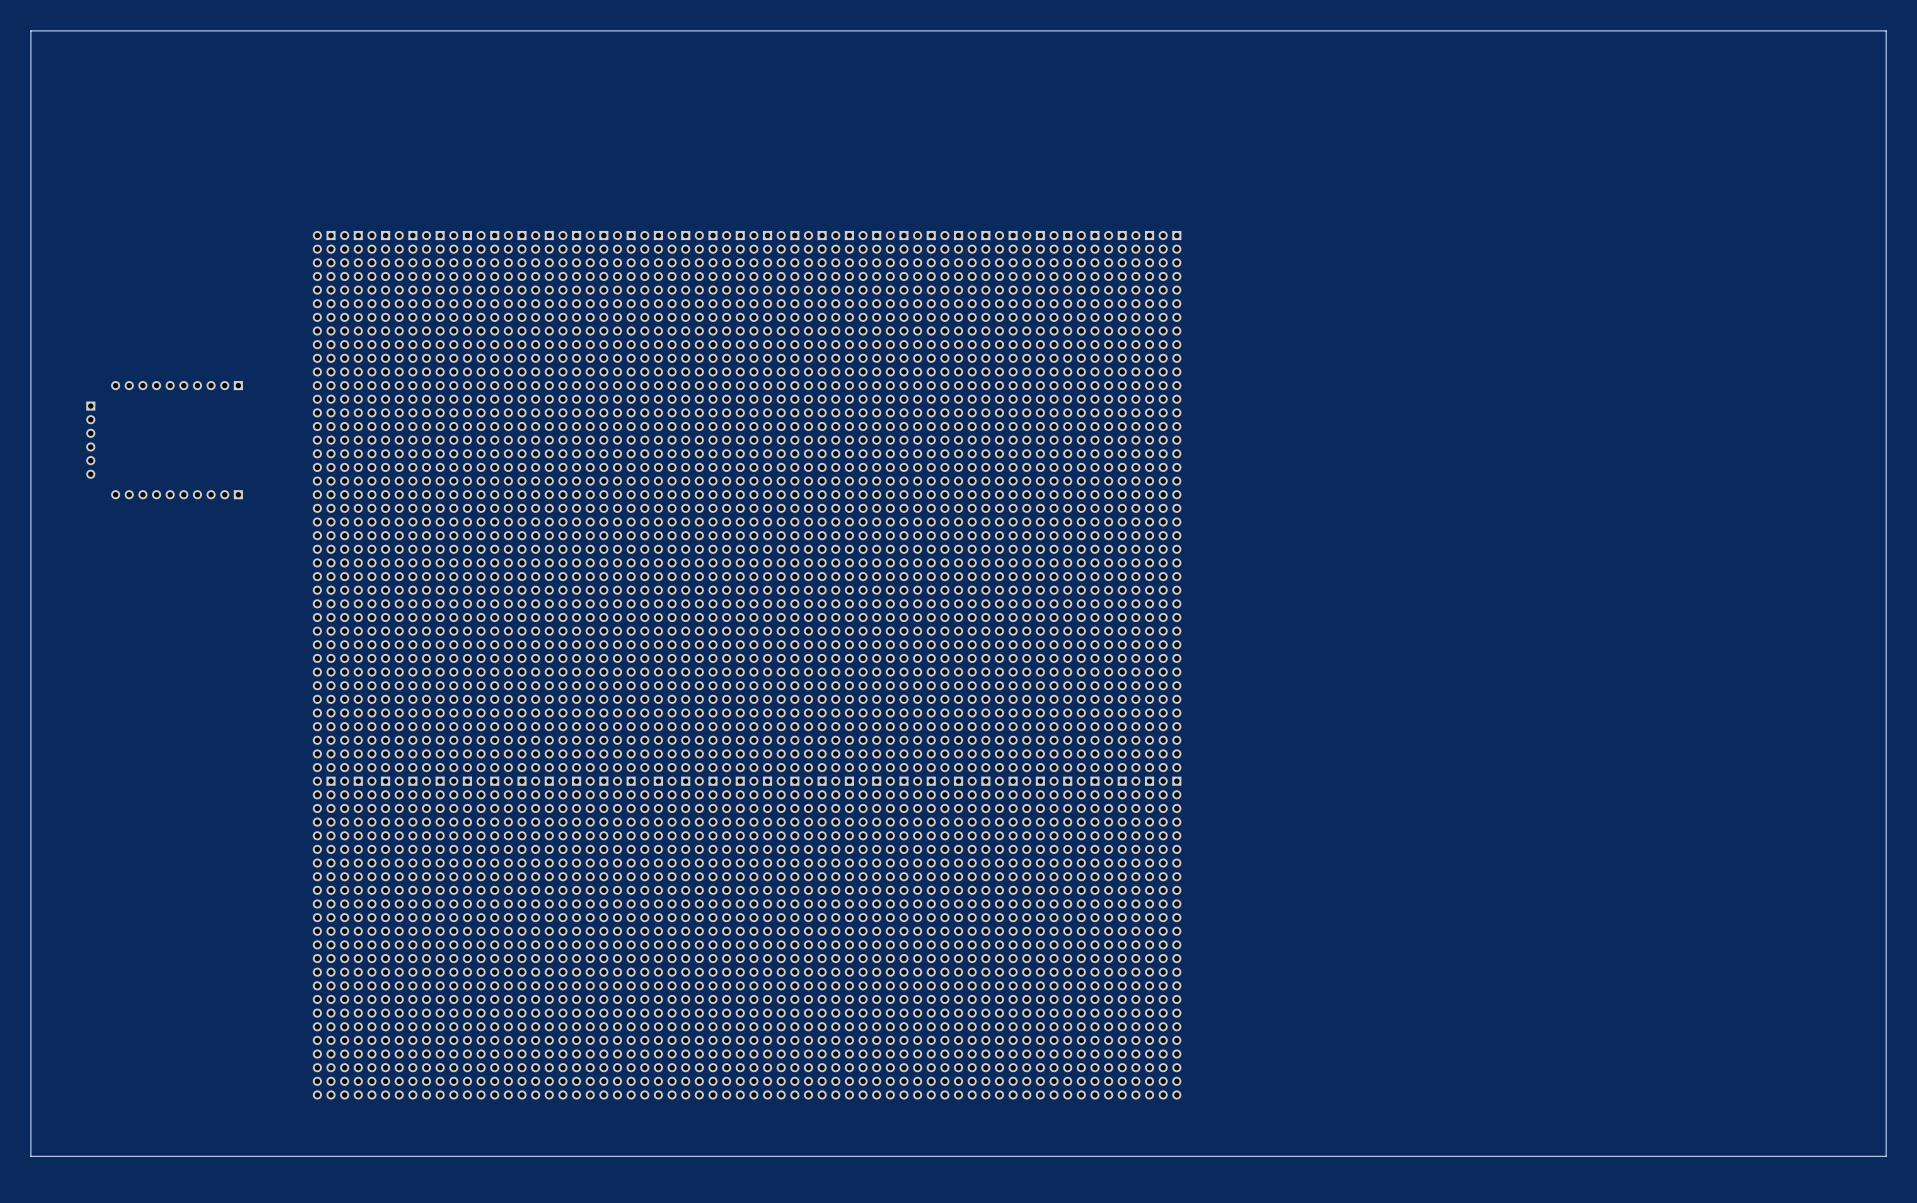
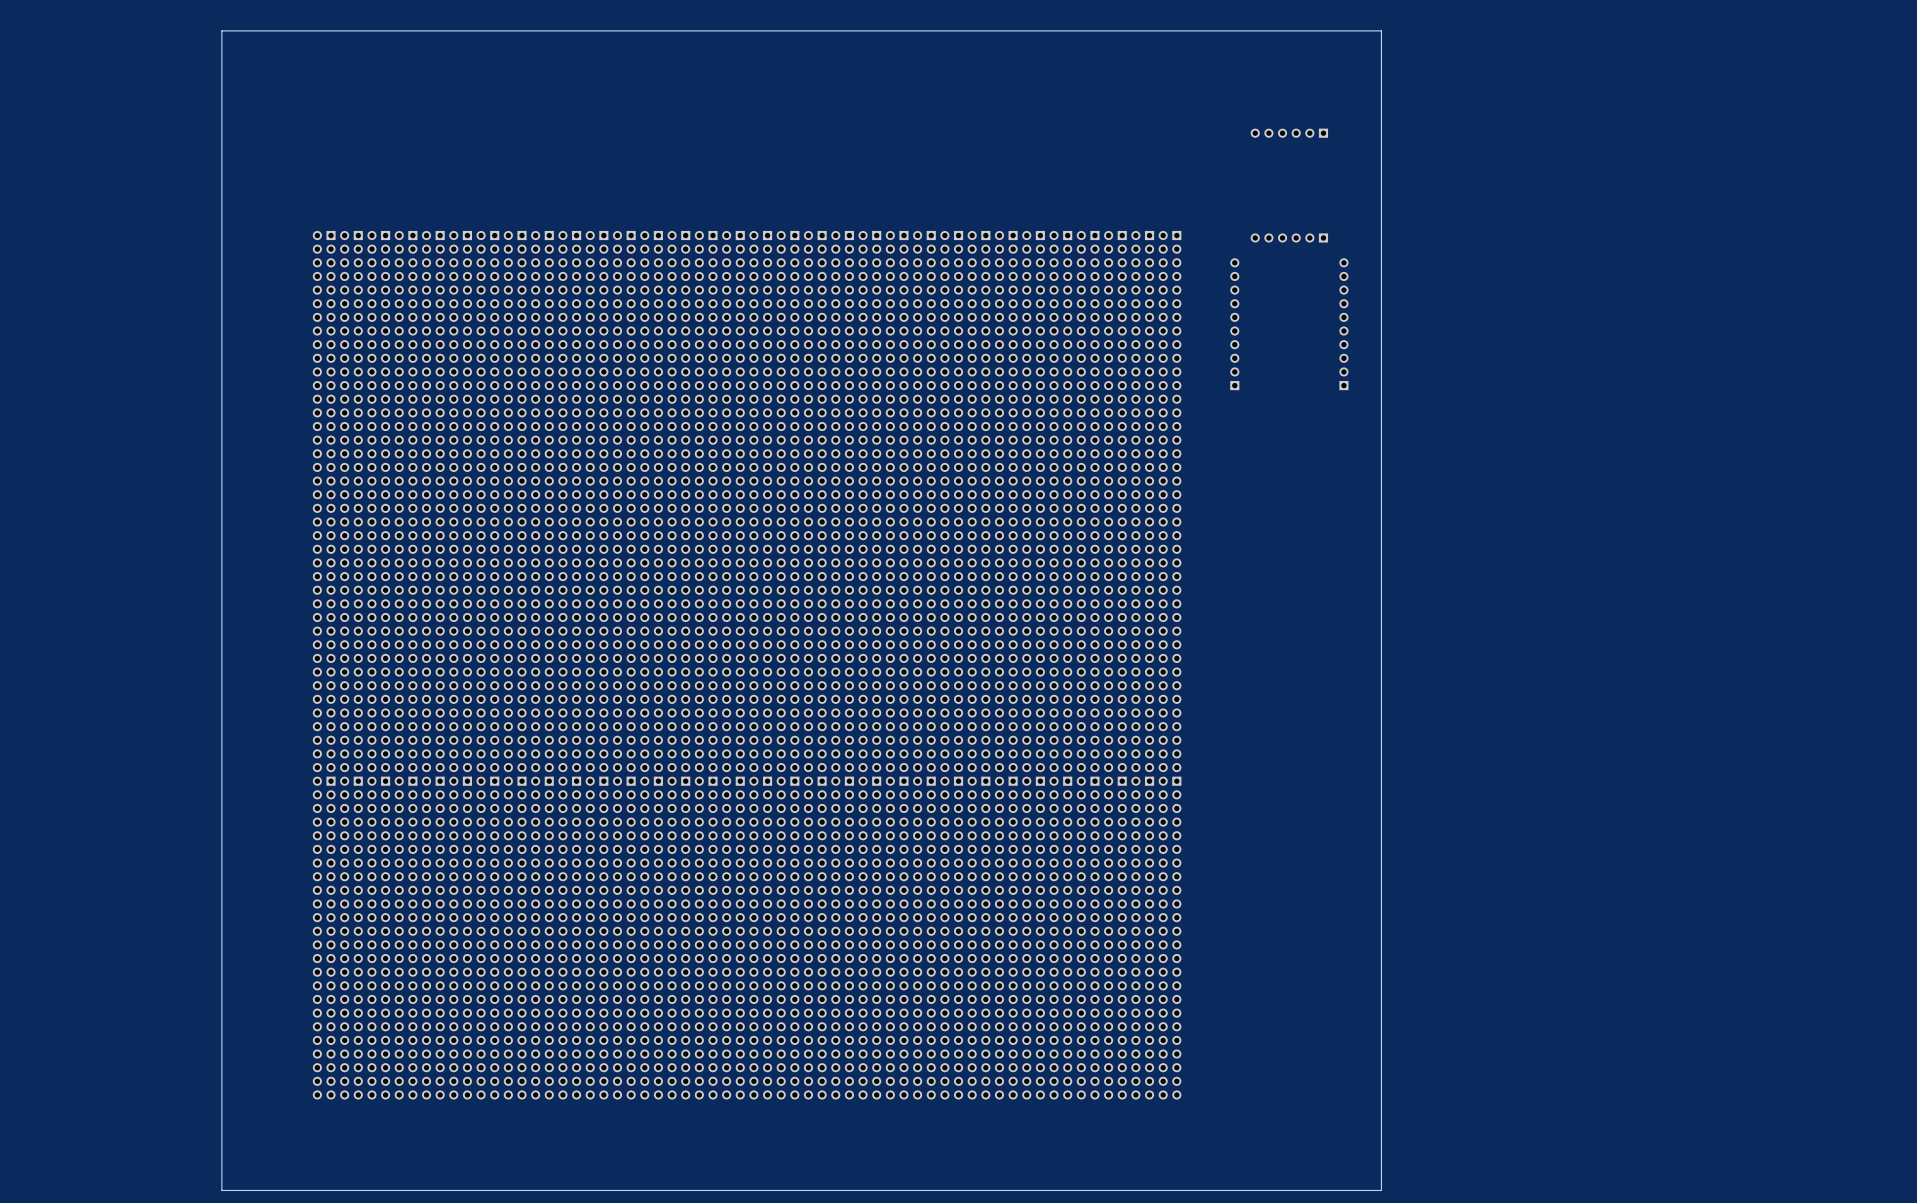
board edge: (1381, 30) (1886, 30) (1886, 1156) (30, 1156) (30, 30) (221, 30) -> (1381, 30) (1381, 1190) (221, 1190) (221, 30)
part: none -> (1289, 133)
part: none -> (1289, 237)
part: none -> (1234, 324)
part: none -> (1343, 324)
part: (177, 385) -> none
part: (90, 440) -> none
part: (177, 494) -> none

